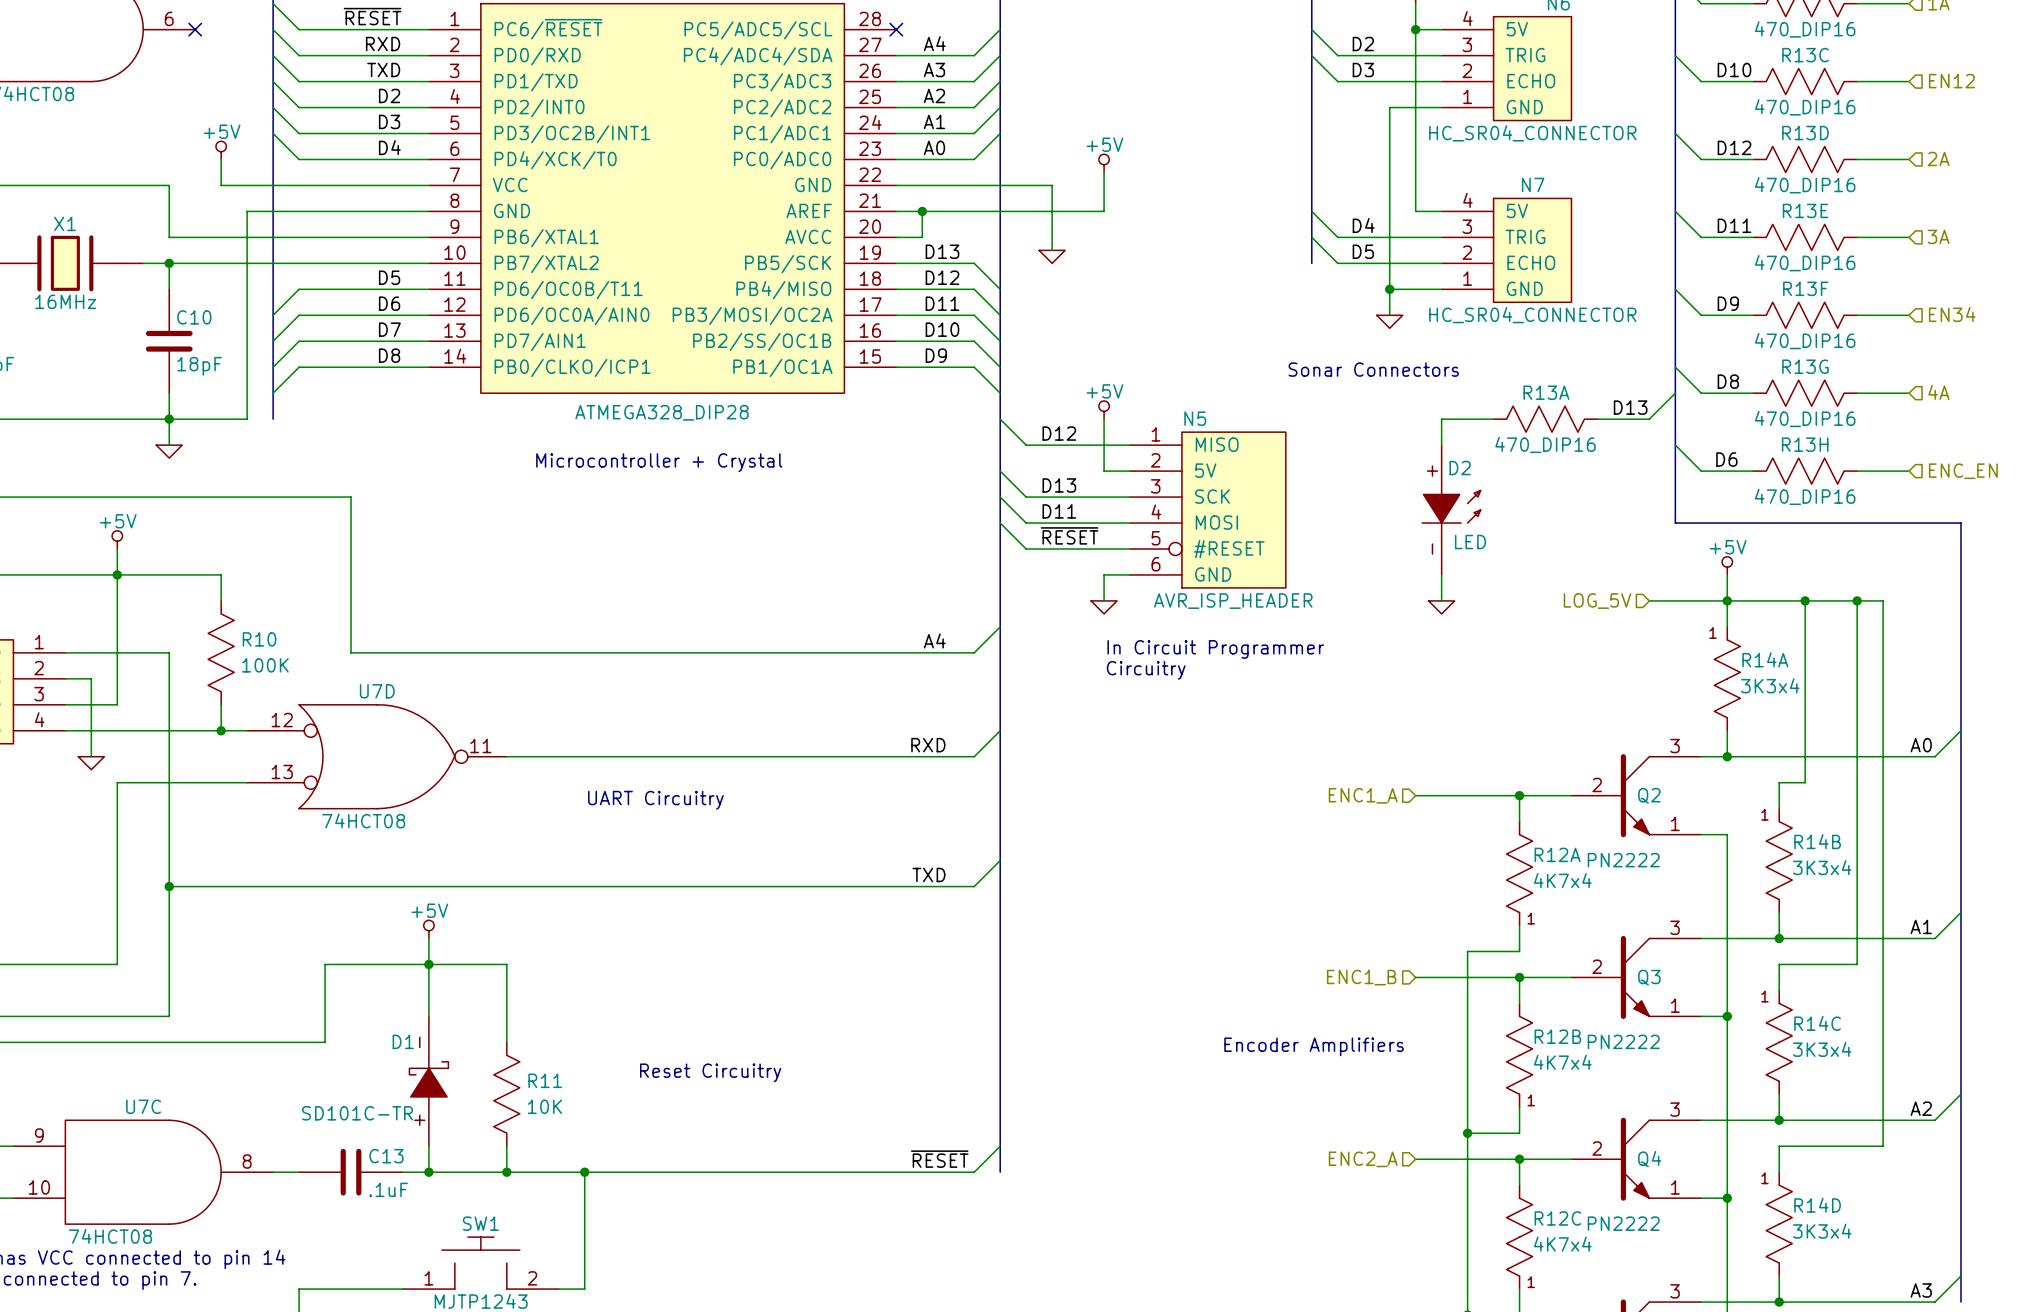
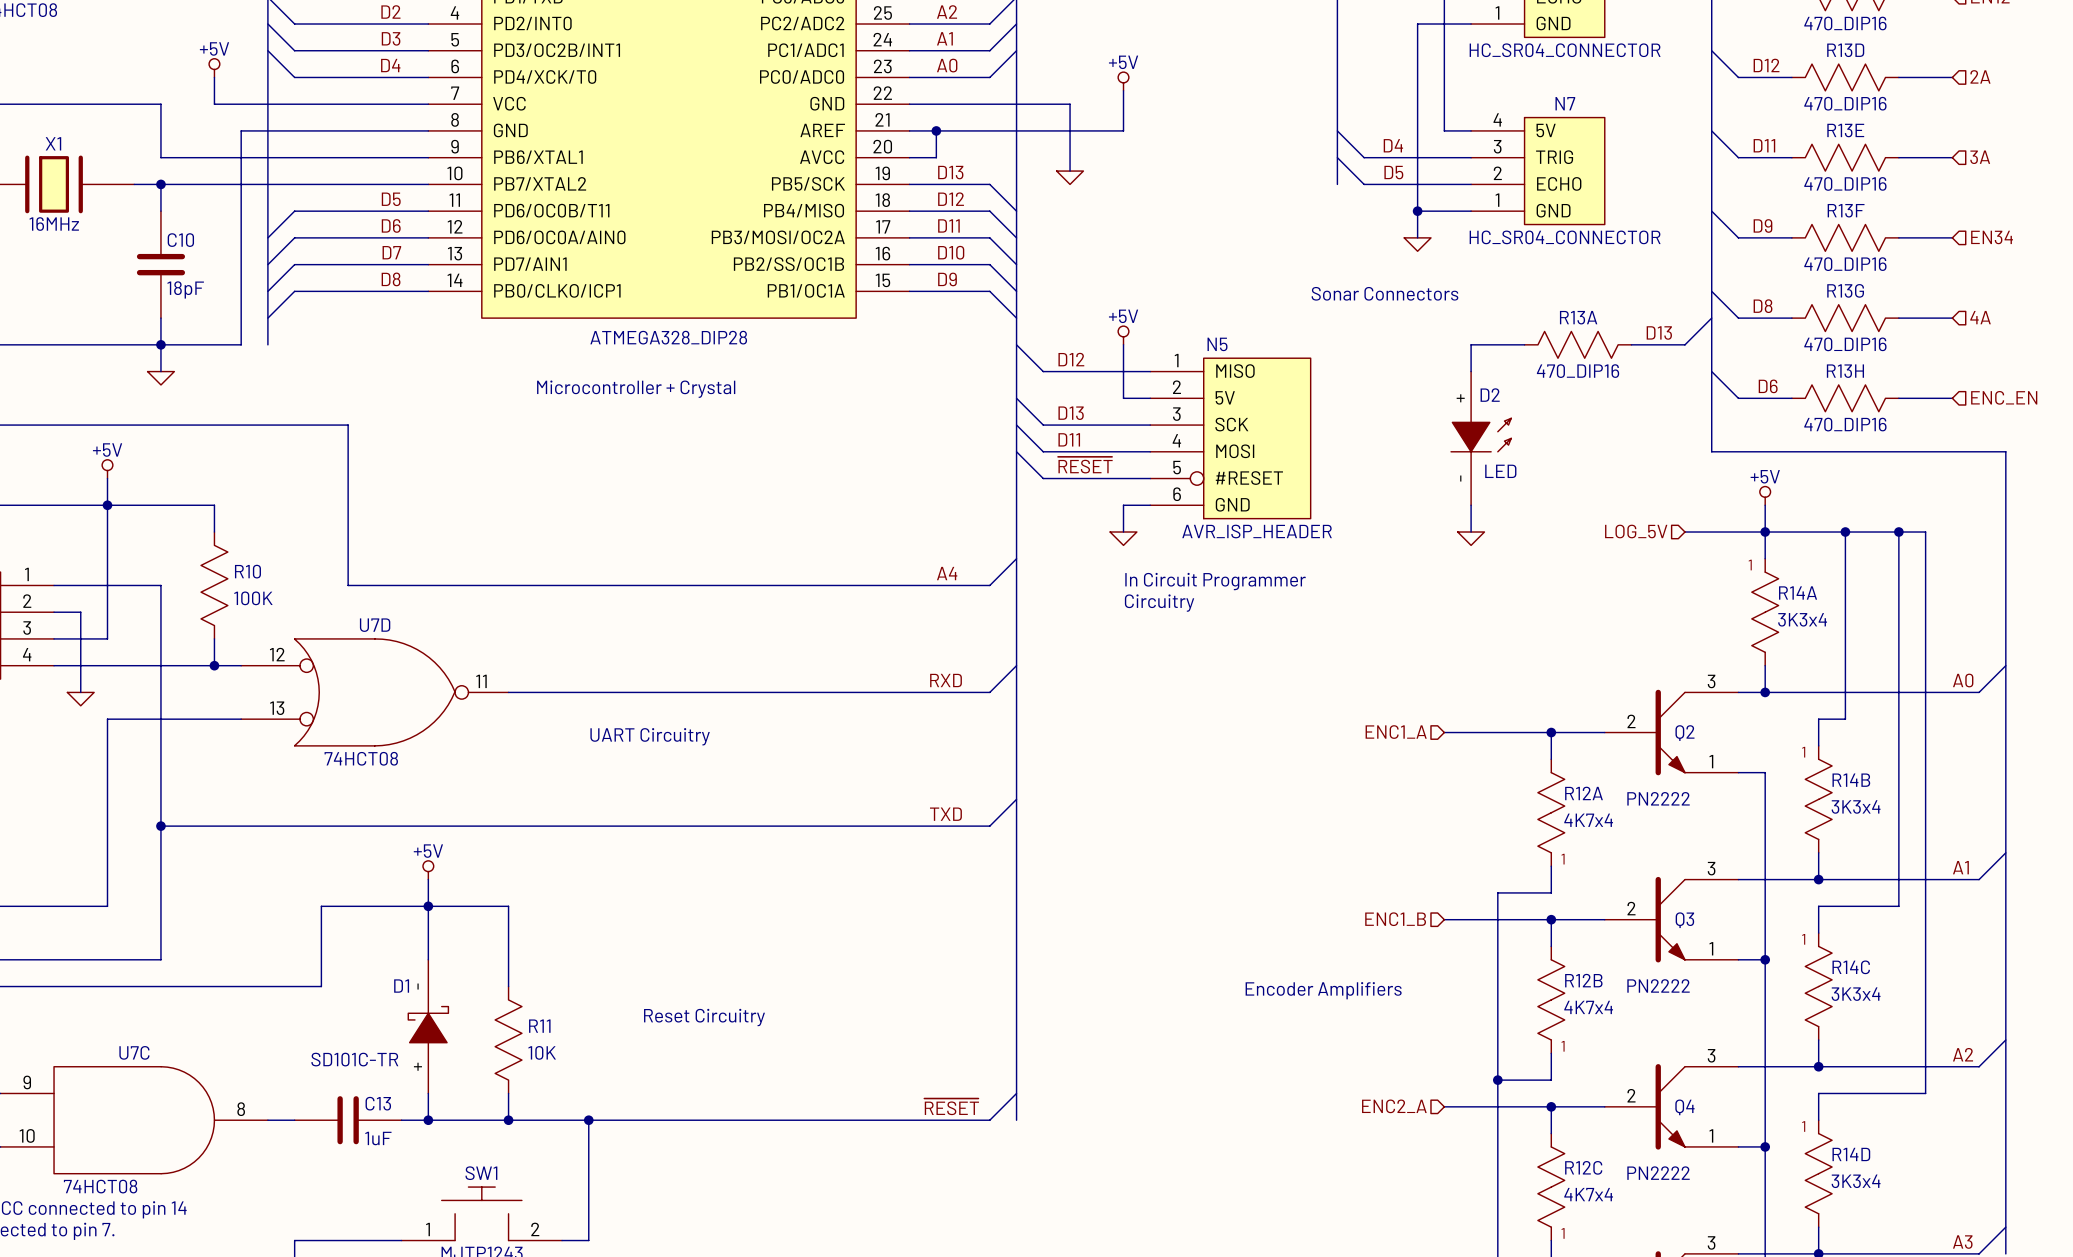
C13 value: .1uF (388, 1189) -> 1uF (378, 1138)

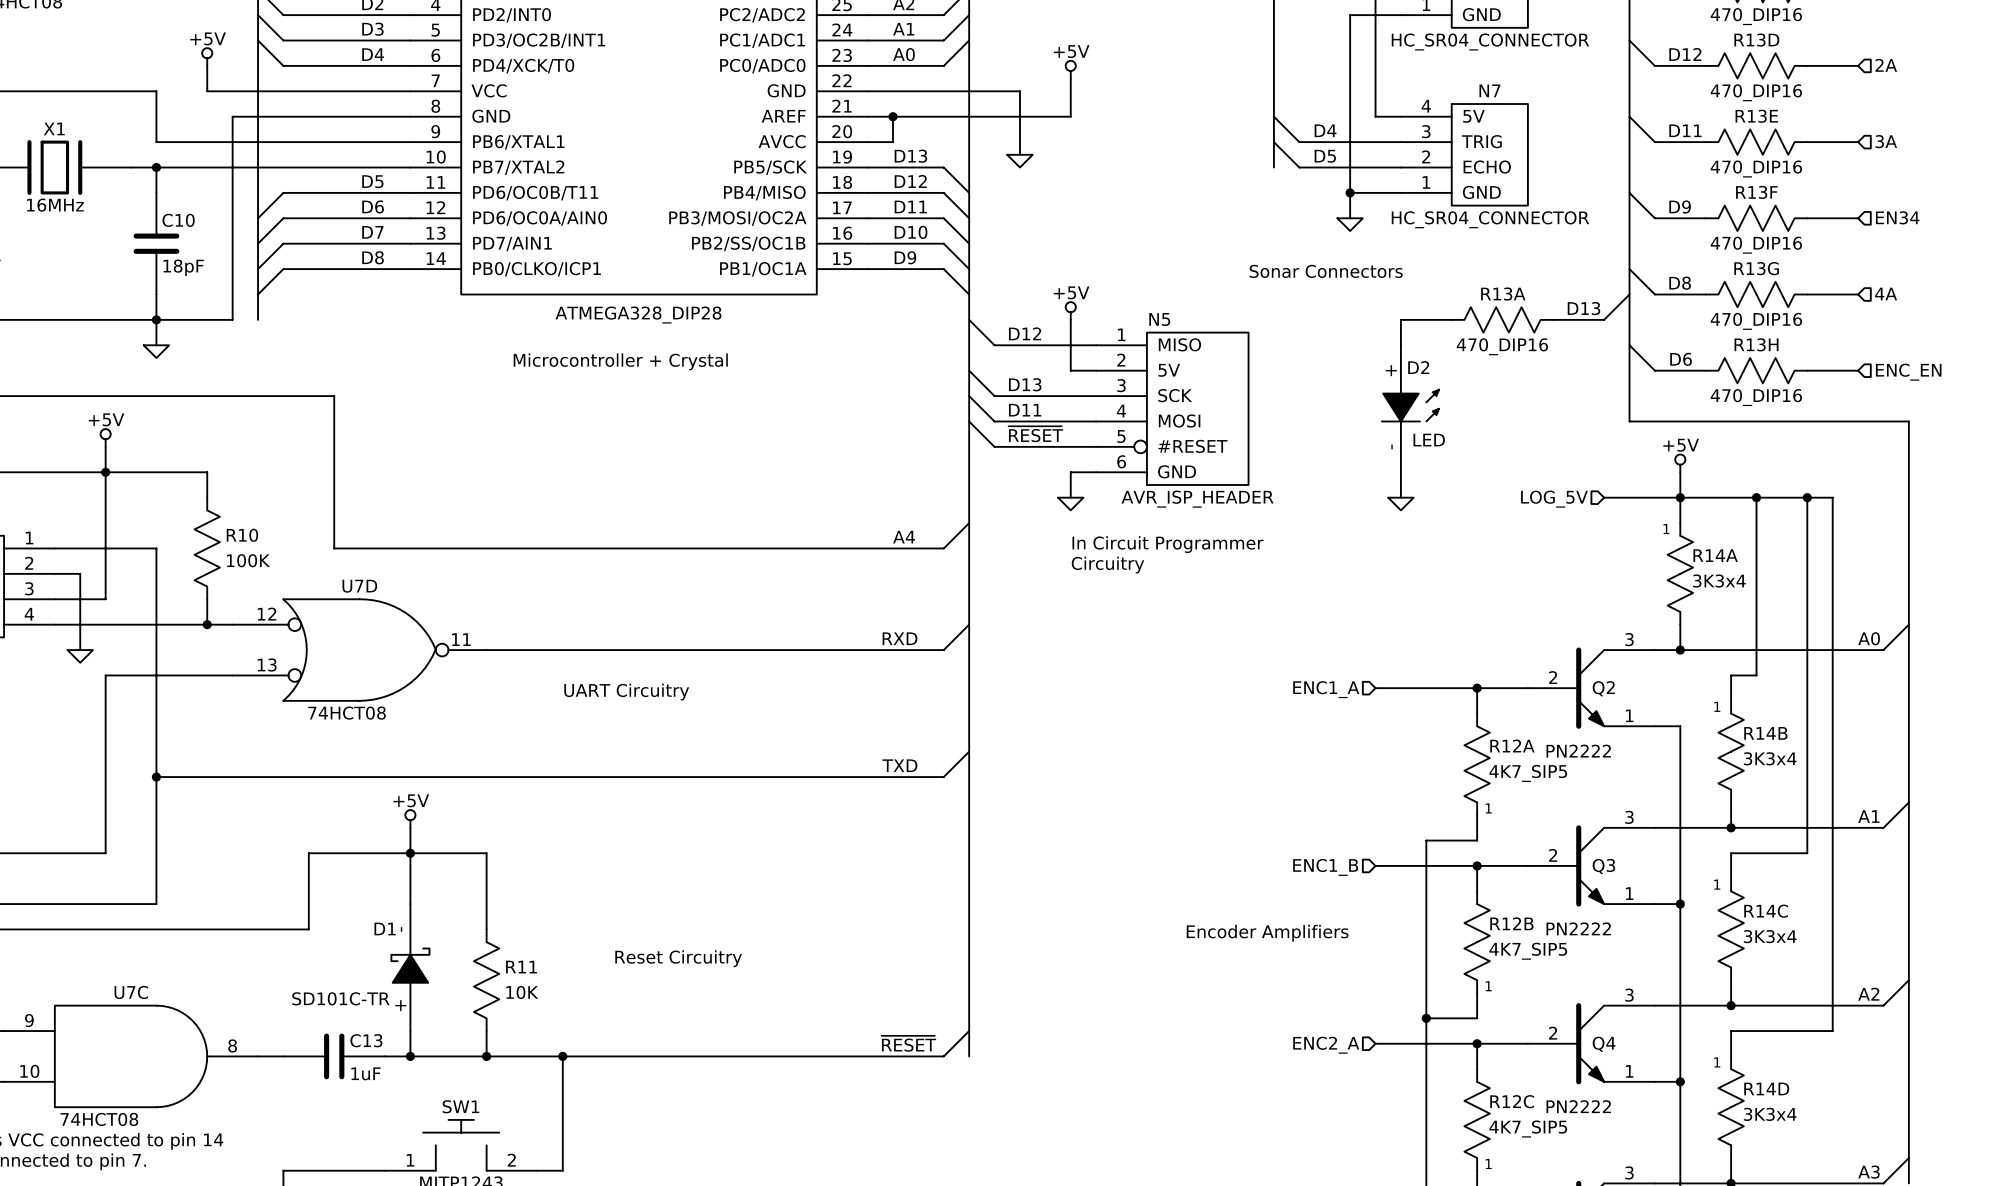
R12A value: 4K7x4 (1588, 820) -> 4K7_SIP5 (1528, 773)
R12B value: 4K7x4 (1588, 1007) -> 4K7_SIP5 (1528, 951)
R12C value: 4K7x4 (1588, 1194) -> 4K7_SIP5 (1528, 1129)

